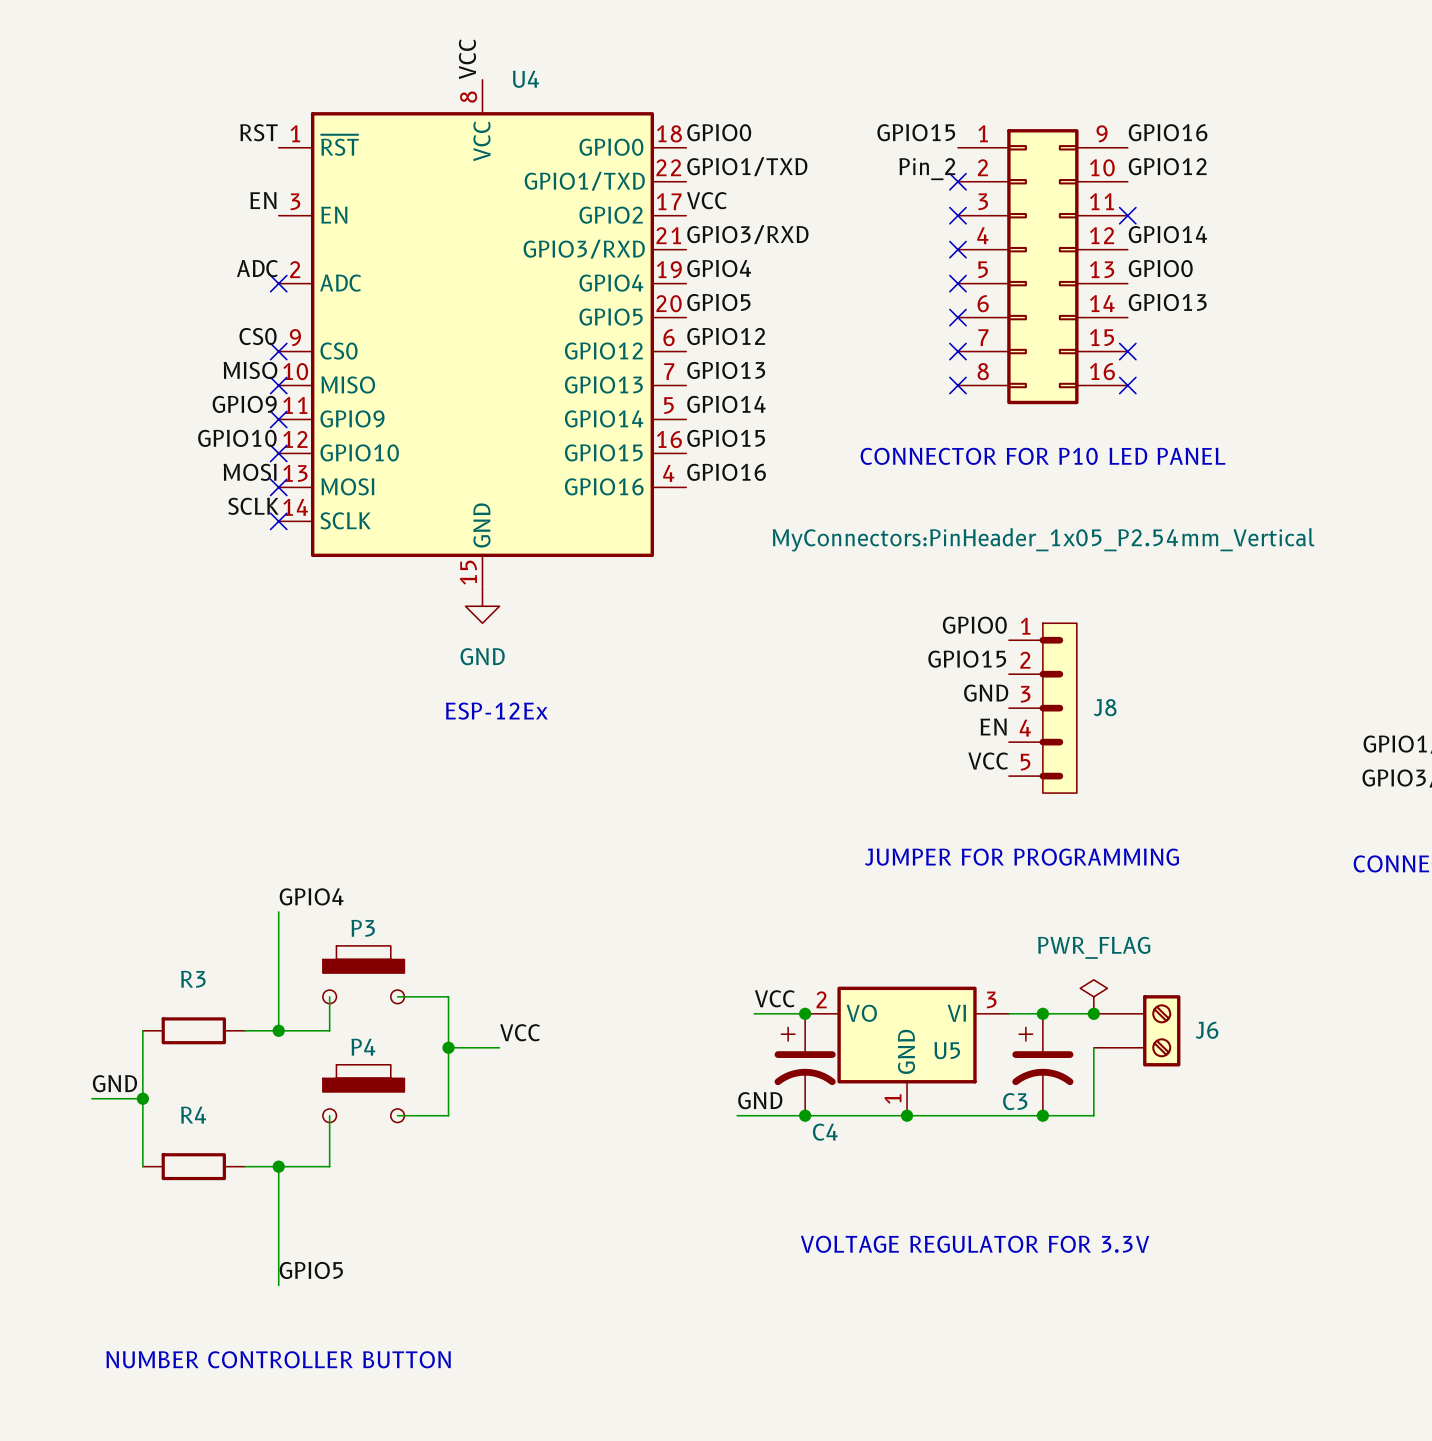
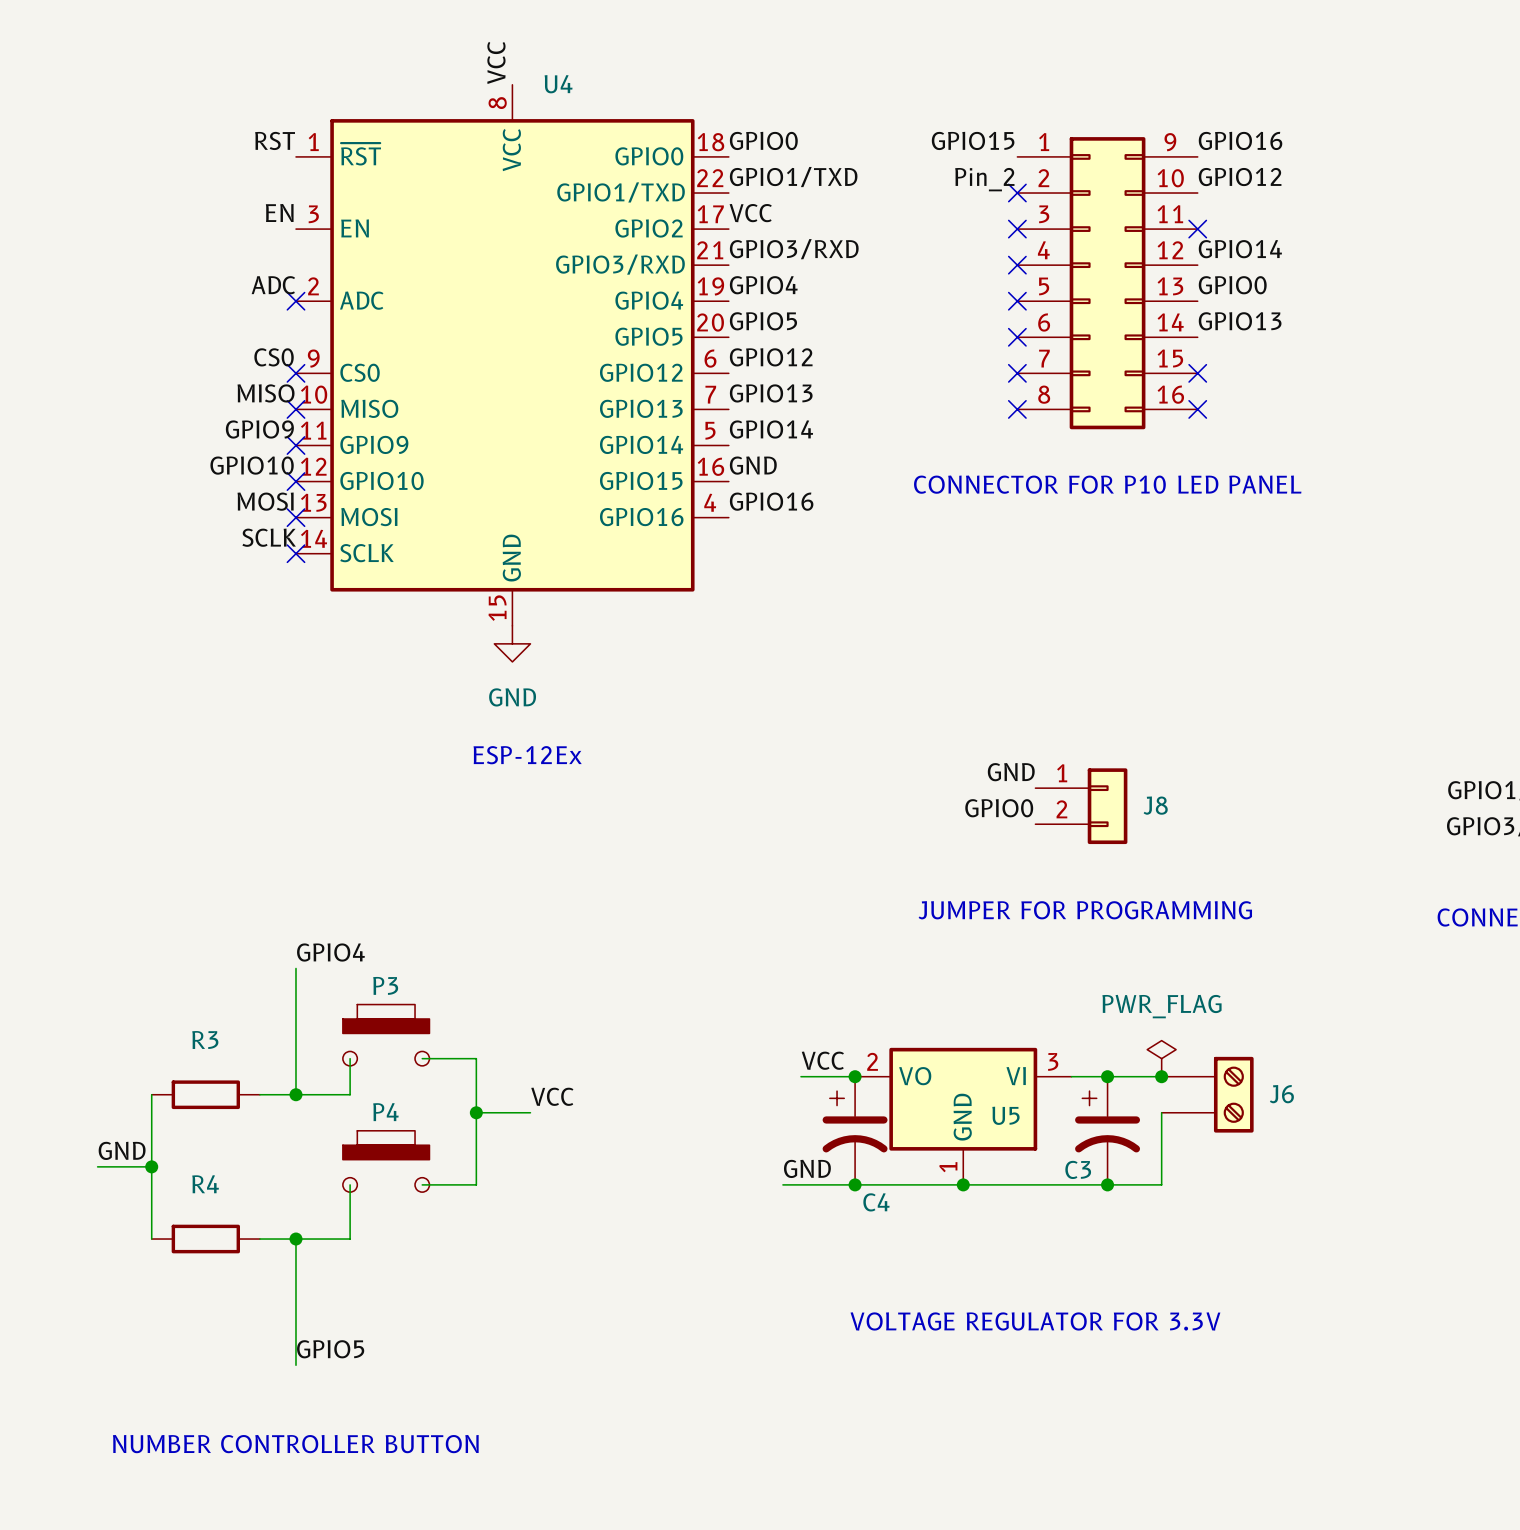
label: GPIO15 (726, 438) -> GND (753, 465)
J8 text: MyConnectors:PinHeader_1x05_P2.54mm_Vertical (1043, 539) -> none
J8 symbol: [1008, 623, 1077, 794] -> [1035, 768, 1128, 845]
label position: GPIO0 (974, 625) -> GPIO0 (999, 808)
label: GPIO15 (967, 659) -> none
label position: GND (986, 693) -> GND (1011, 772)
label: EN (993, 726) -> none
label: VCC (988, 761) -> none

